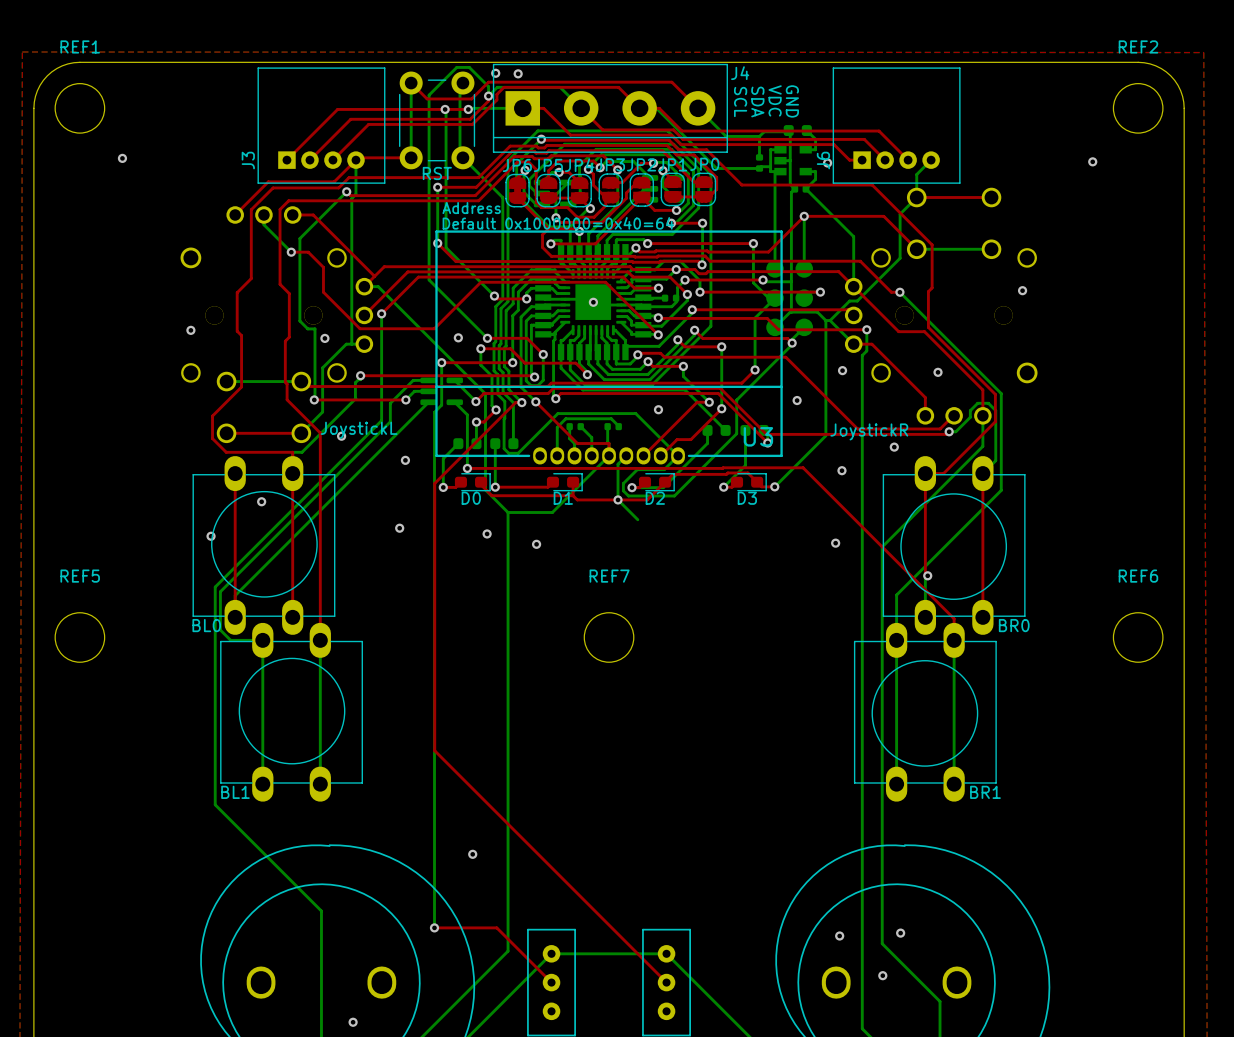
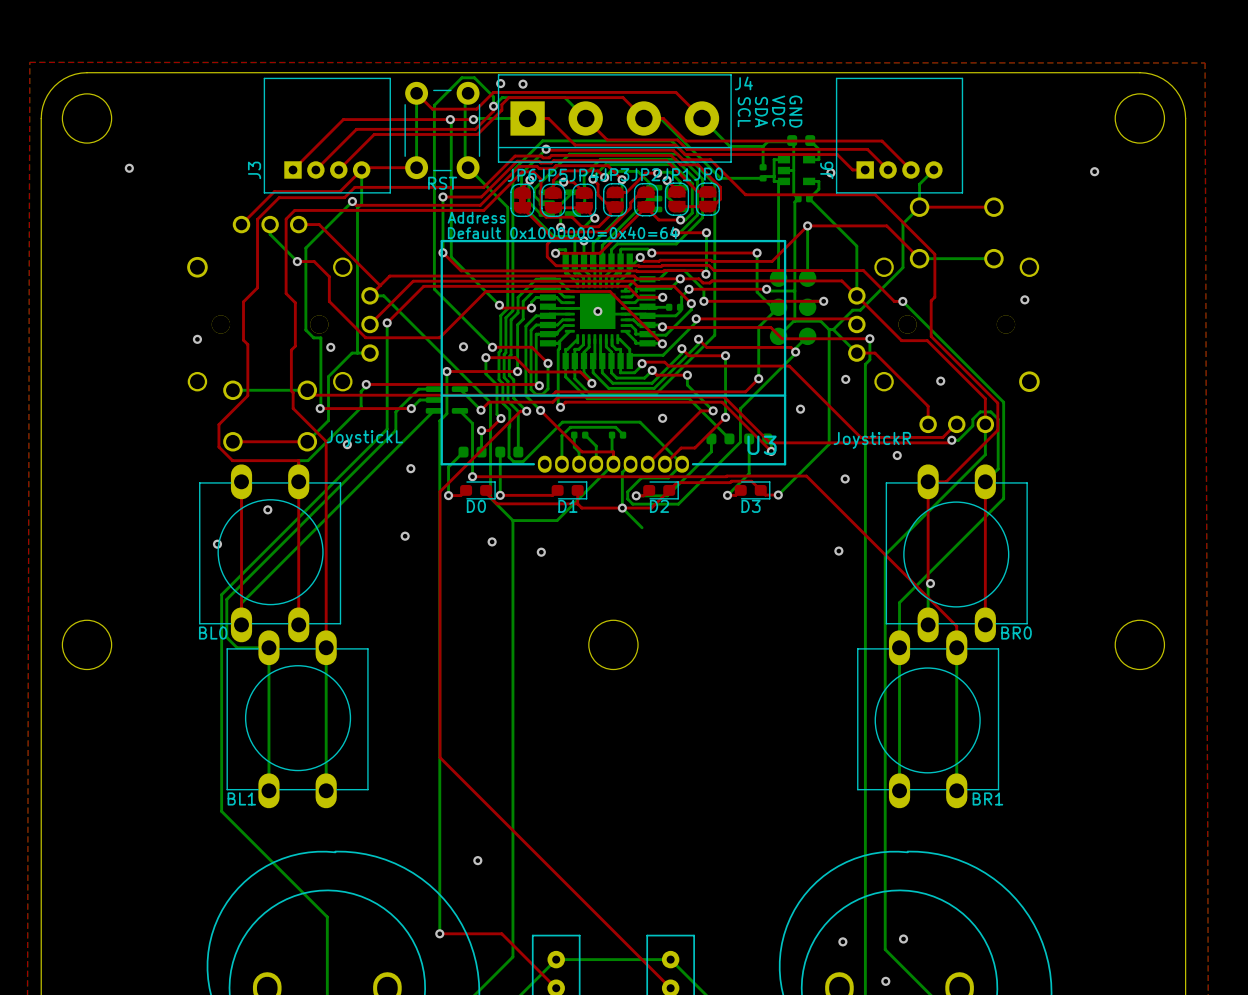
REF1 name: REF1 (80, 46) -> none
REF2 name: REF2 (1138, 46) -> none
REF5 name: REF5 (80, 576) -> none
REF7 name: REF7 (609, 576) -> none
REF6 name: REF6 (1138, 576) -> none

